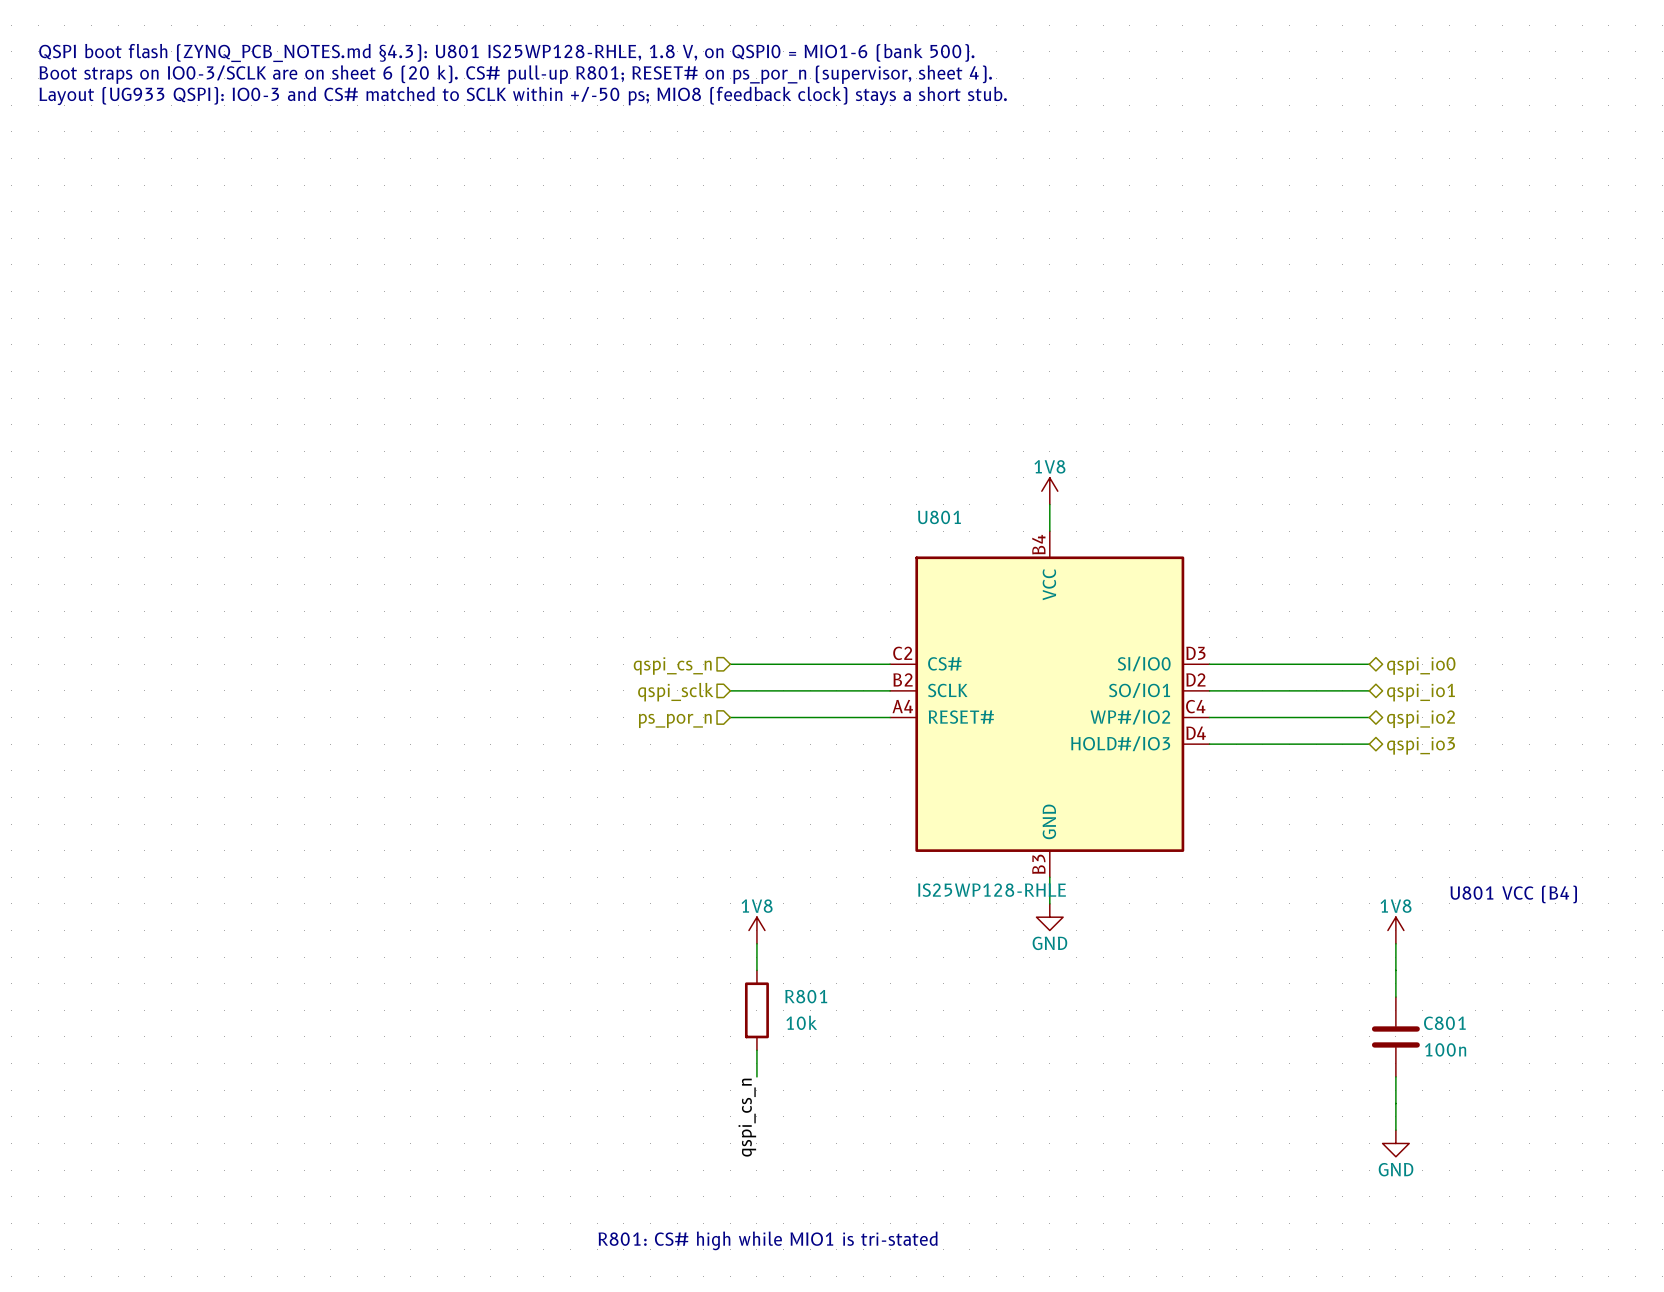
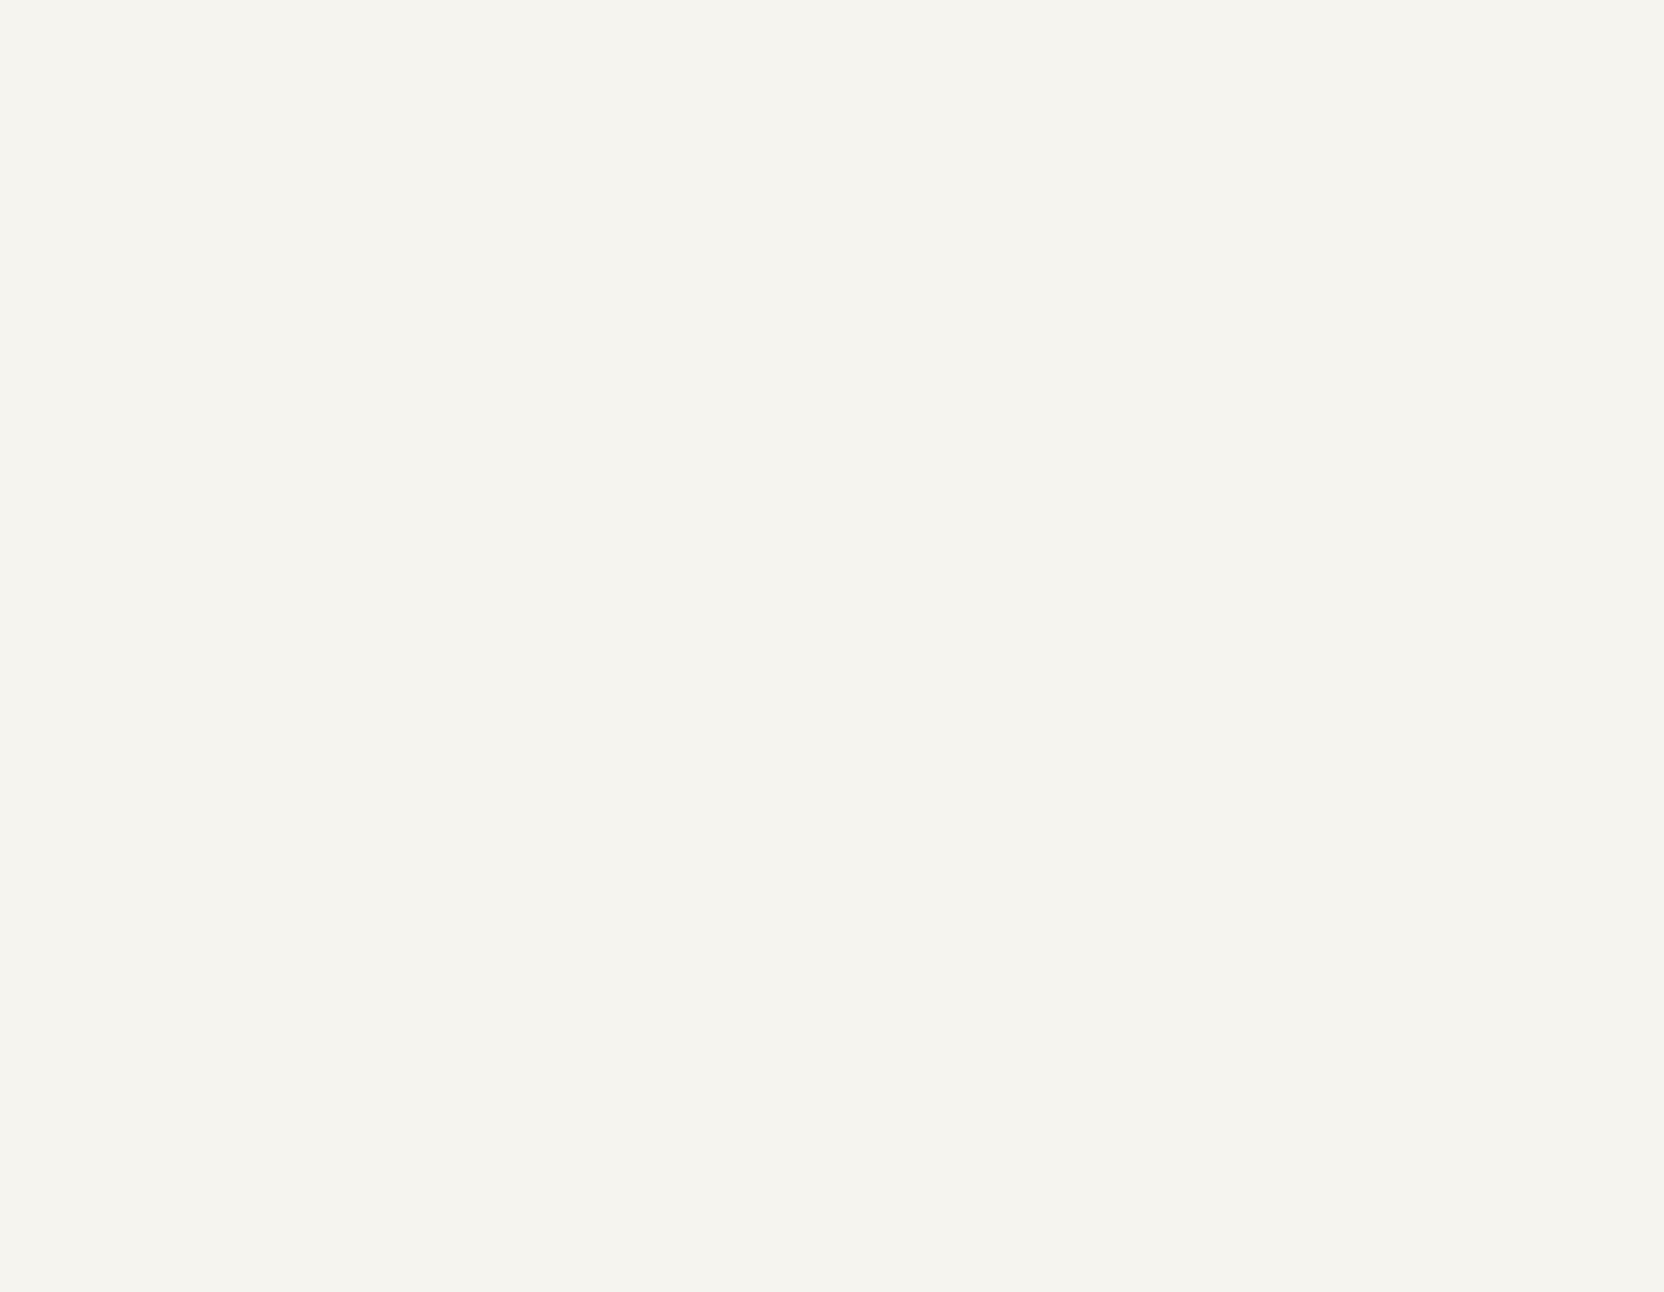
text: QSPI boot flash (ZYNQ_PCB_NOTES.md §4.3): U801 IS25WP128-RHLE, 1.8 V, on QSPI0 = MIO1-6 (bank 500). (506, 52) -> none
text: Boot straps on IO0-3/SCLK are on sheet 6 (20 k). CS# pull-up R801; RESET# on ps_por_n (supervisor, sheet 4). (515, 74) -> none
text: Layout (UG933 QSPI): IO0-3 and CS# matched to SCLK within +/-50 ps; MIO8 (feedback clock) stays a short stub. (523, 96) -> none
power symbol: 1V8 (1049, 491) -> none
wire: (1049, 504) (1049, 531) -> none
wire: (730, 664) (890, 664) -> none
wire: (1209, 664) (1369, 664) -> none
hierarchical label: qspi_io0 (1421, 665) -> none
hierarchical label: qspi_cs_n (672, 666) -> none
wire: (730, 690) (890, 690) -> none
wire: (1209, 690) (1369, 690) -> none
hierarchical label: qspi_sclk (675, 692) -> none
hierarchical label: qspi_io1 (1420, 692) -> none
U801: IS25WP128-RHLE (1049, 704) -> none
wire: (730, 717) (890, 717) -> none
wire: (1209, 717) (1369, 717) -> none
hierarchical label: qspi_io2 (1421, 719) -> none
hierarchical label: ps_por_n (675, 720) -> none
wire: (1209, 744) (1369, 744) -> none
hierarchical label: qspi_io3 (1421, 745) -> none
wire: (1049, 877) (1049, 903) -> none
text: U801 VCC (B4) (1513, 894) -> none
power symbol: GND (1049, 917) -> none
power symbol: 1V8 (756, 930) -> none
power symbol: 1V8 (1395, 930) -> none
wire: (756, 943) (756, 970) -> none
wire: (1395, 943) (1395, 997) -> none
R801: 10k (756, 1010) -> none
C801: 100n (1395, 1036) -> none
wire: (756, 1050) (756, 1076) -> none
wire: (1395, 1076) (1395, 1130) -> none
label: qspi_cs_n (747, 1117) -> none
power symbol: GND (1395, 1143) -> none
text: R801: CS# high while MIO1 is tri-stated (768, 1240) -> none

